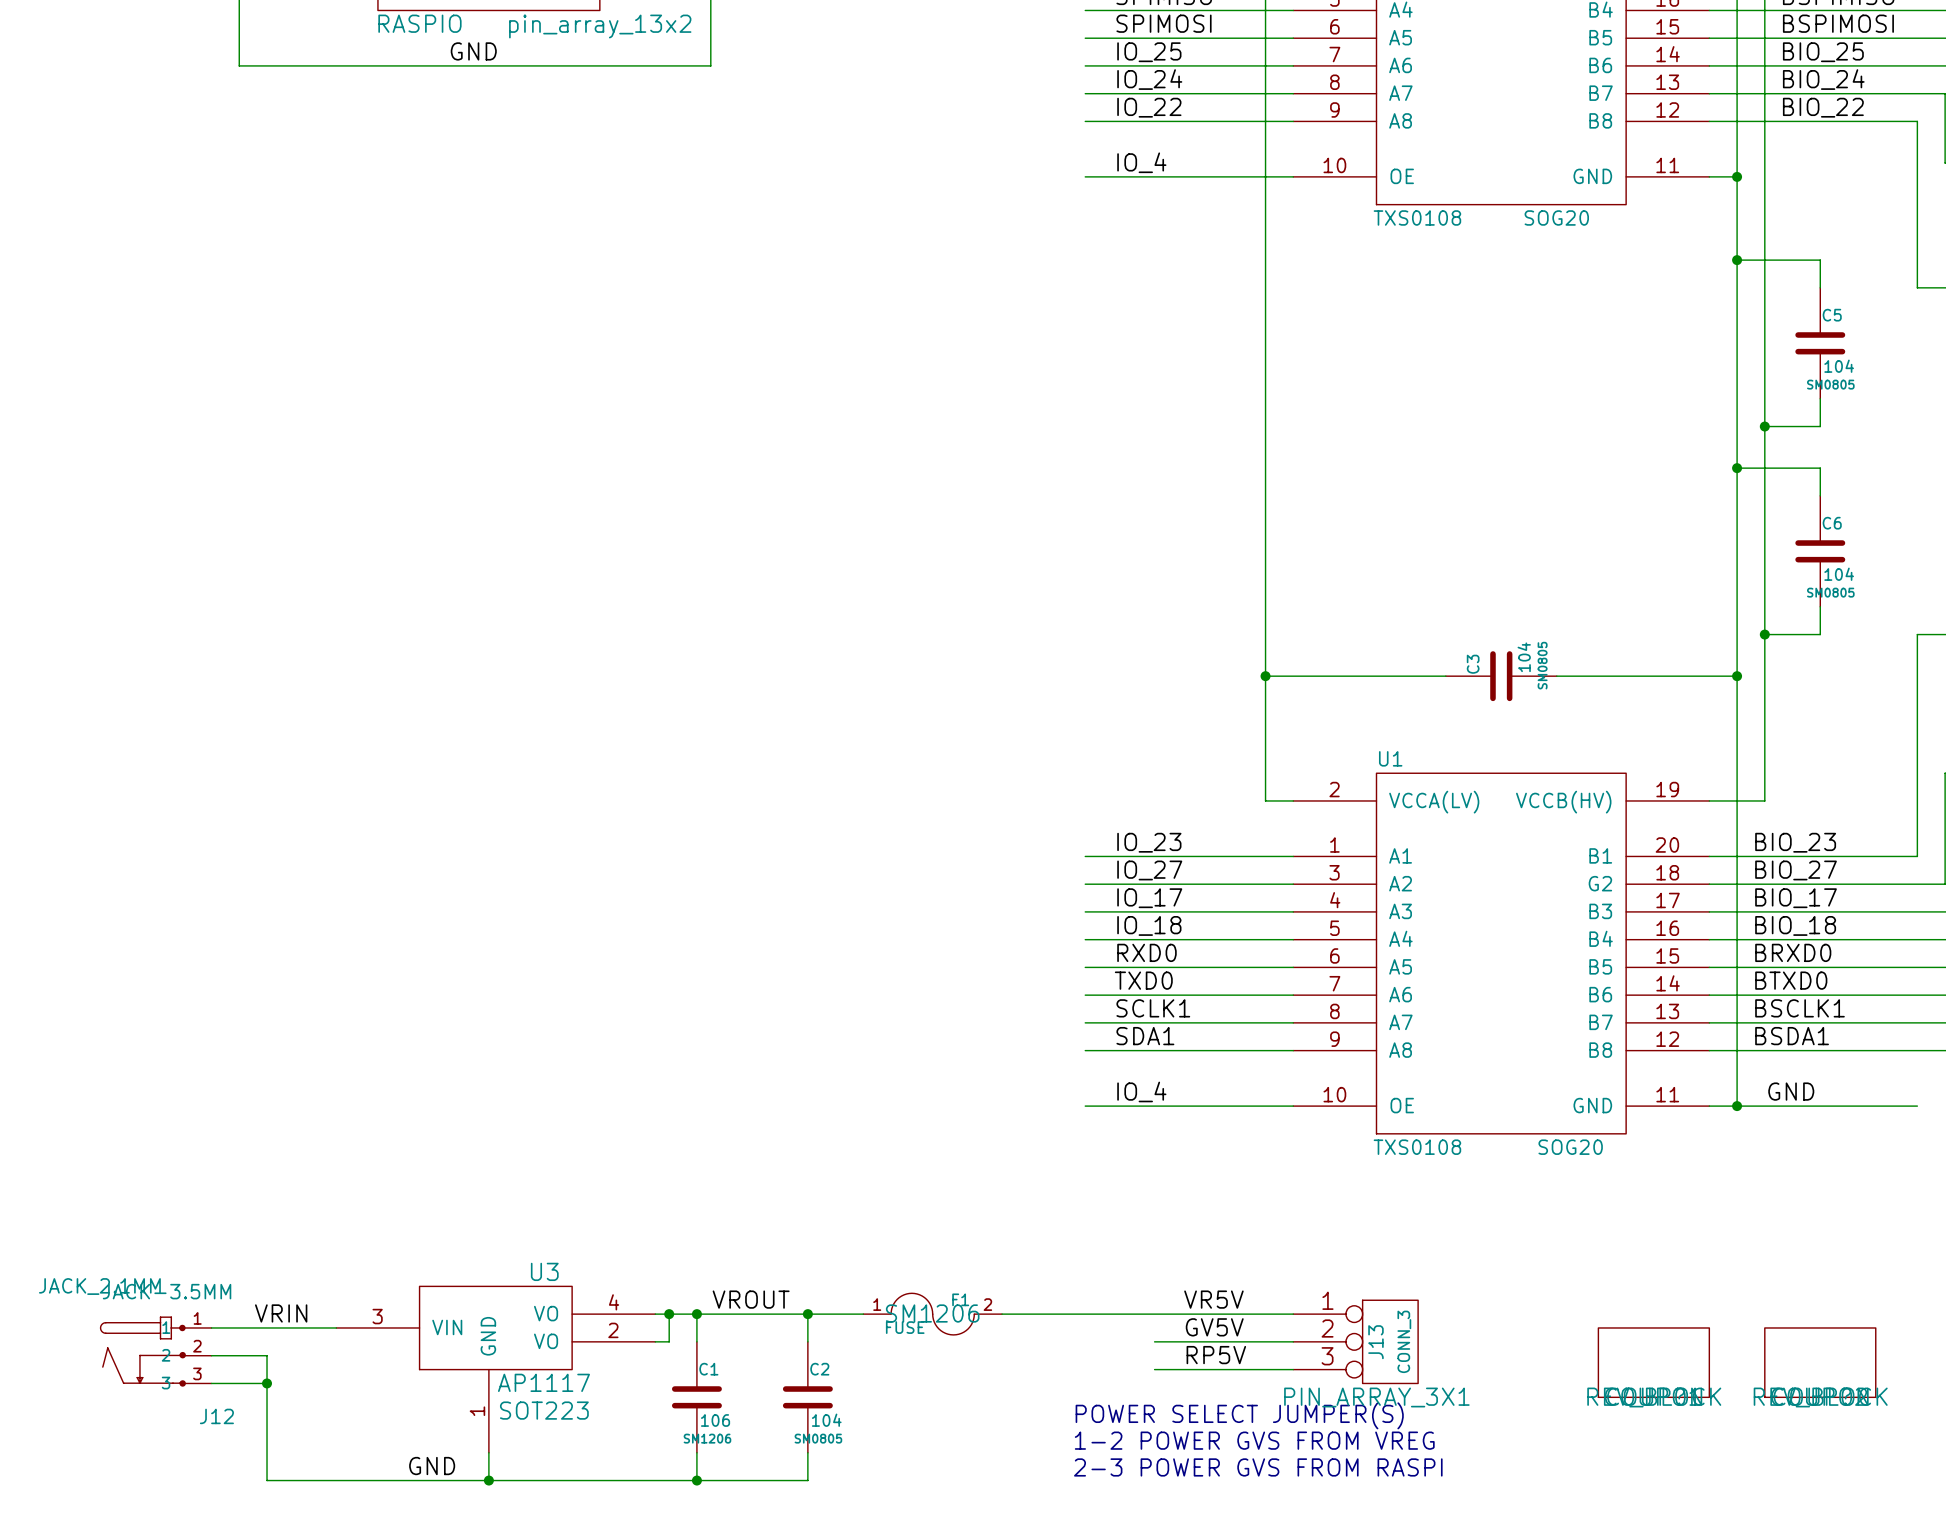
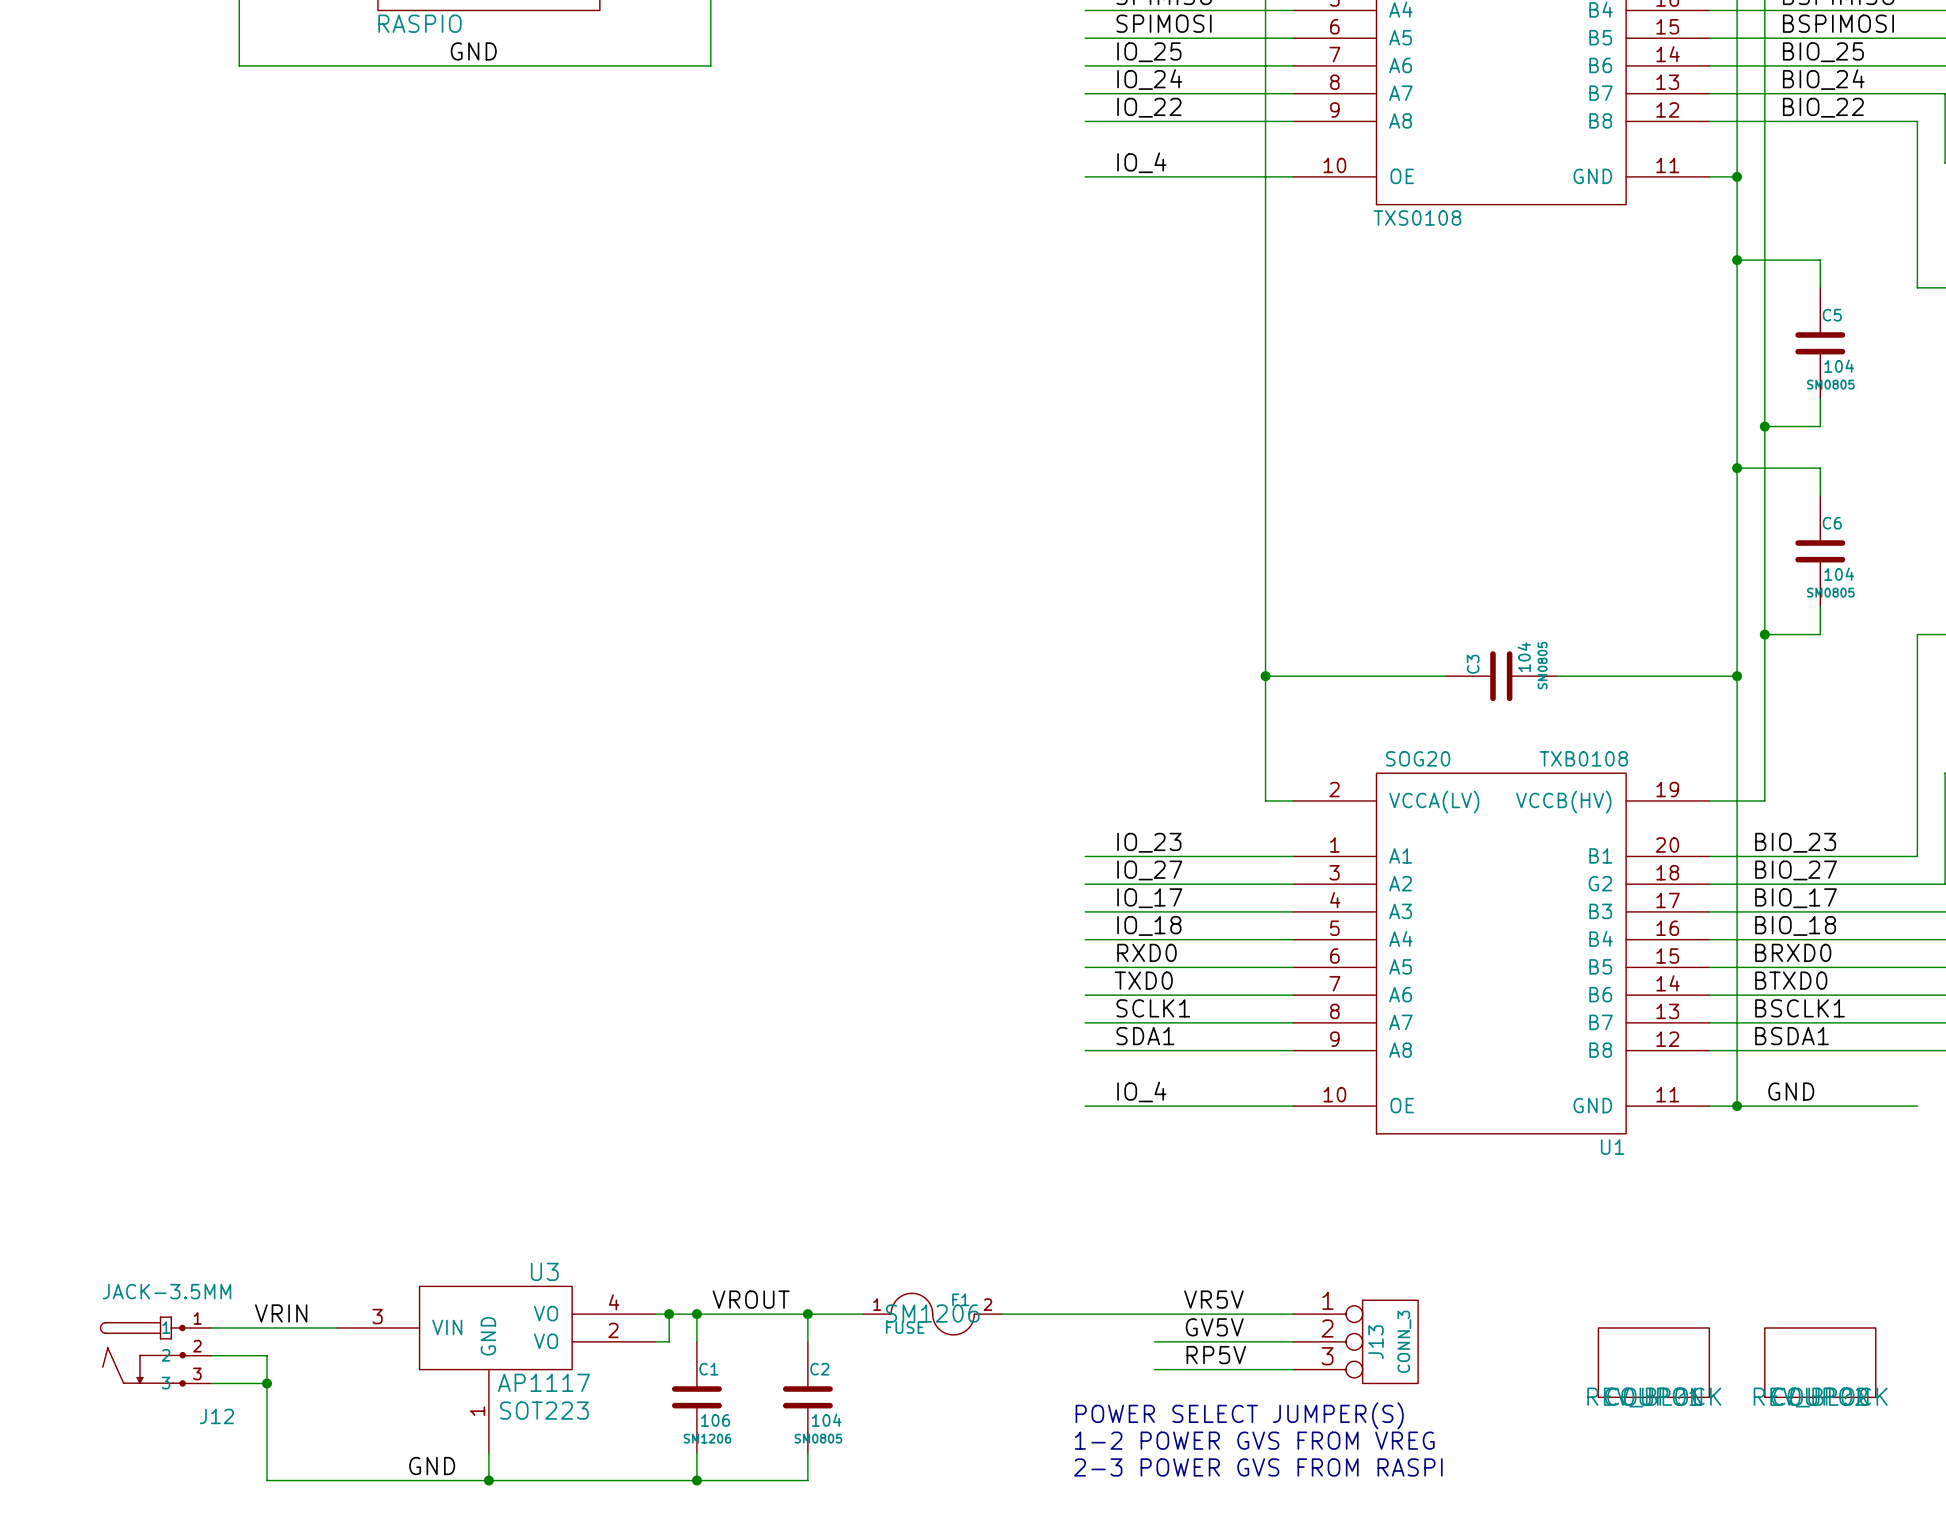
part text: pin_array_13x2 (600, 26) -> none
part text: SOG20 (1556, 217) -> none
U1 name position: U1 (1390, 758) -> U1 (1612, 1147)
U1 value: TXS0108 (1417, 1147) -> TXB0108 (1583, 758)
U1 text position: SOG20 (1570, 1147) -> SOG20 (1418, 758)
J12 text: JACK_2.1MM (99, 1286) -> none
J13 text: PIN_ARRAY_3X1 (1376, 1397) -> none

